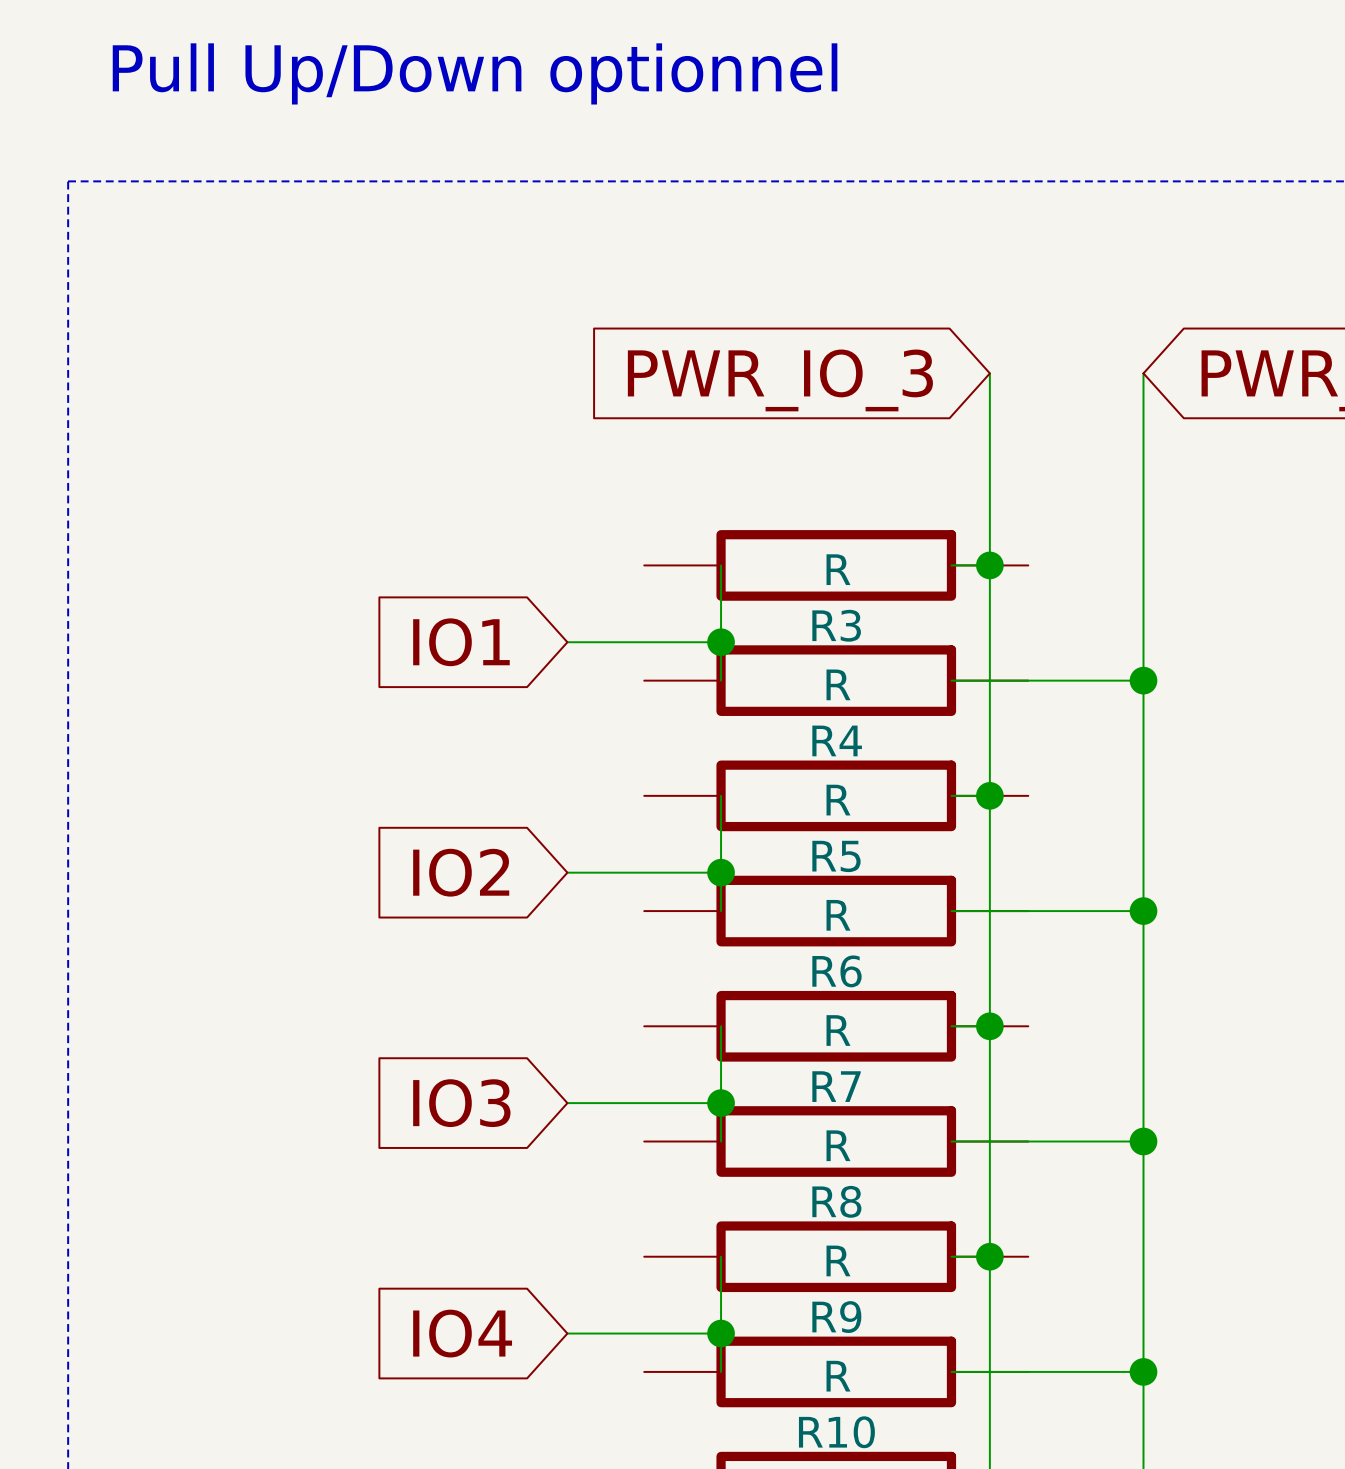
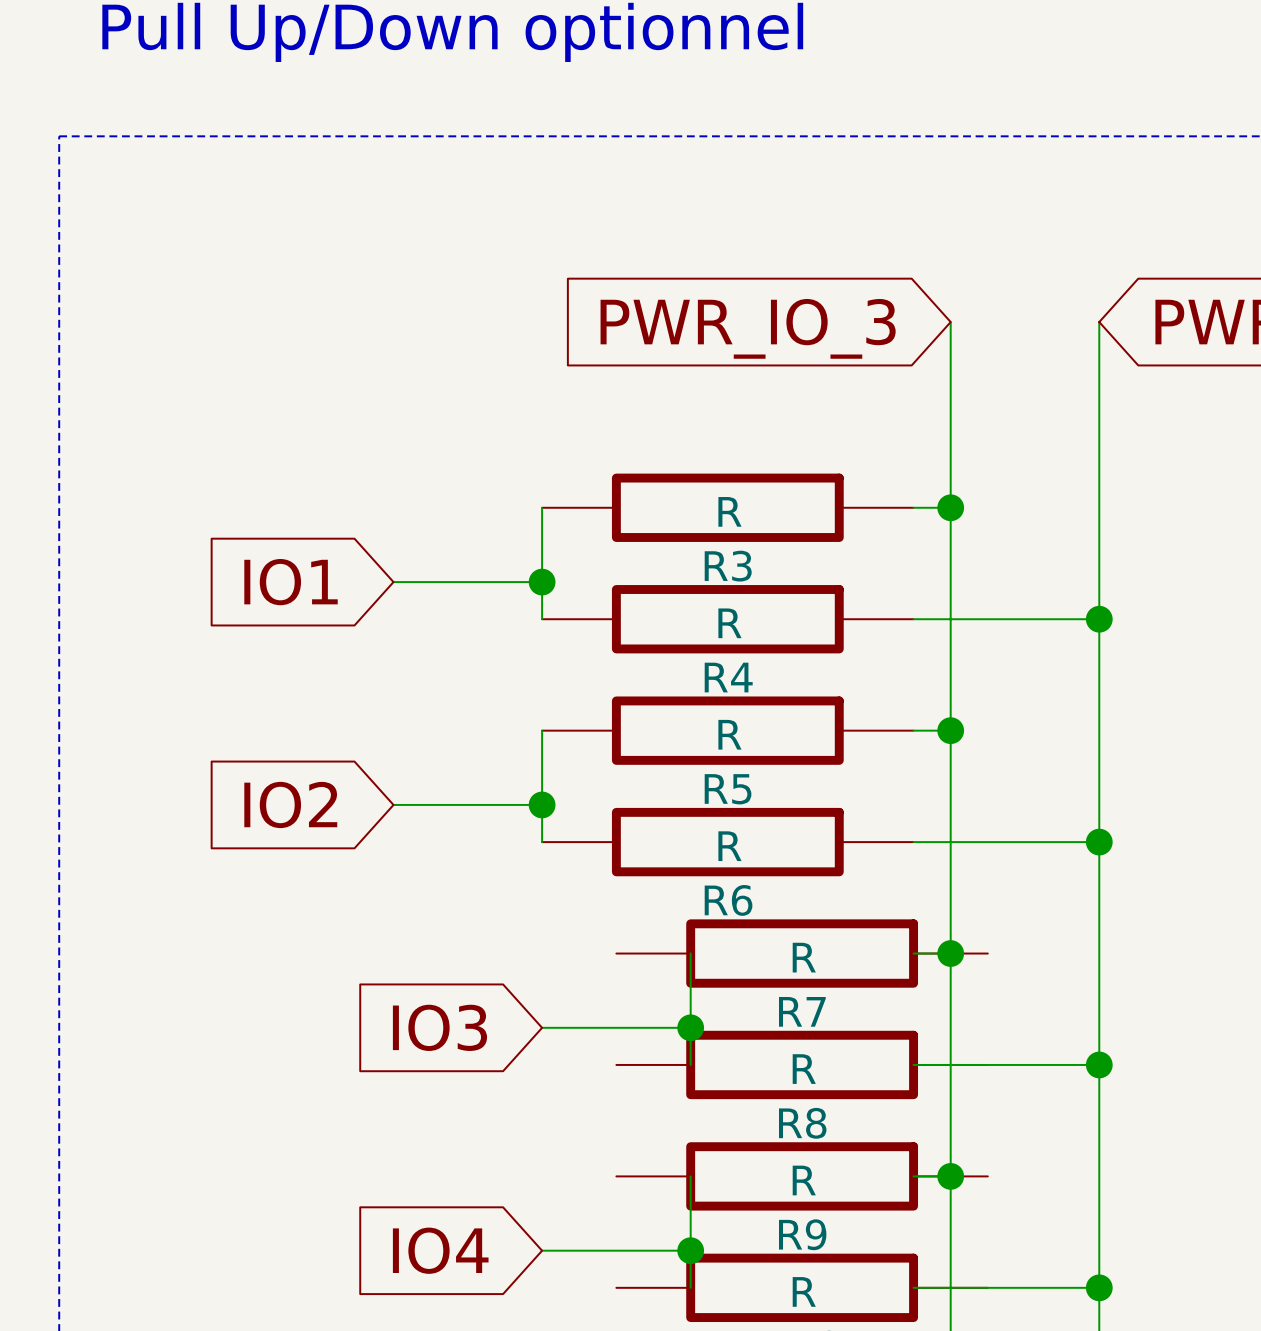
wire: (721, 565) (721, 680) -> (542, 507) (542, 619)
R3 position: (836, 565) -> (727, 507)
global label position: IO1 (461, 642) -> IO1 (291, 582)
wire: (567, 642) (721, 642) -> (542, 582) (393, 582)
junction: none -> (542, 582)
junction: (721, 642) -> none
R4 position: (836, 680) -> (727, 619)
wire: (721, 795) (721, 911) -> (542, 730) (542, 842)
R5 position: (836, 795) -> (727, 730)
global label position: IO2 (461, 872) -> IO2 (290, 804)
wire: (567, 872) (721, 872) -> (542, 804) (393, 804)
junction: none -> (542, 804)
junction: (721, 872) -> none
R6 position: (836, 911) -> (727, 842)

